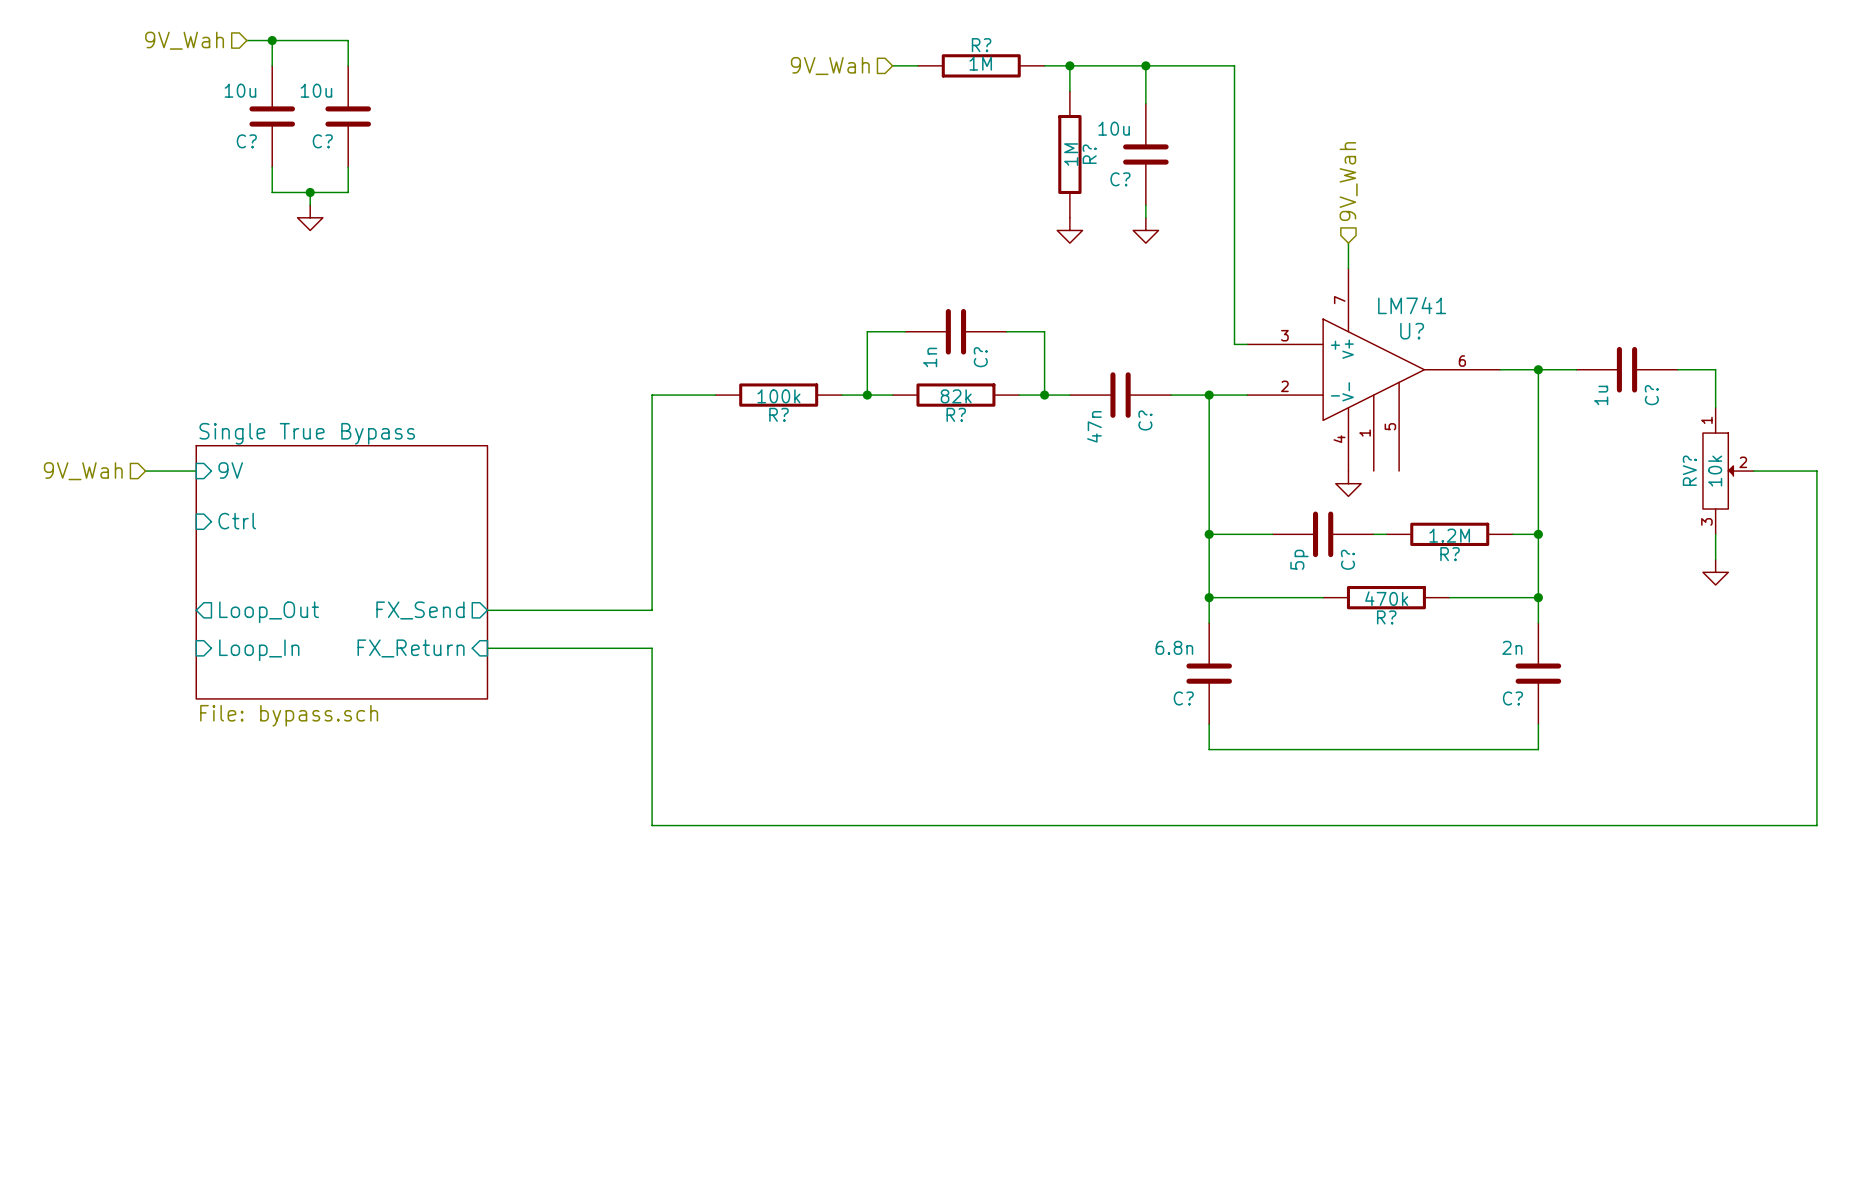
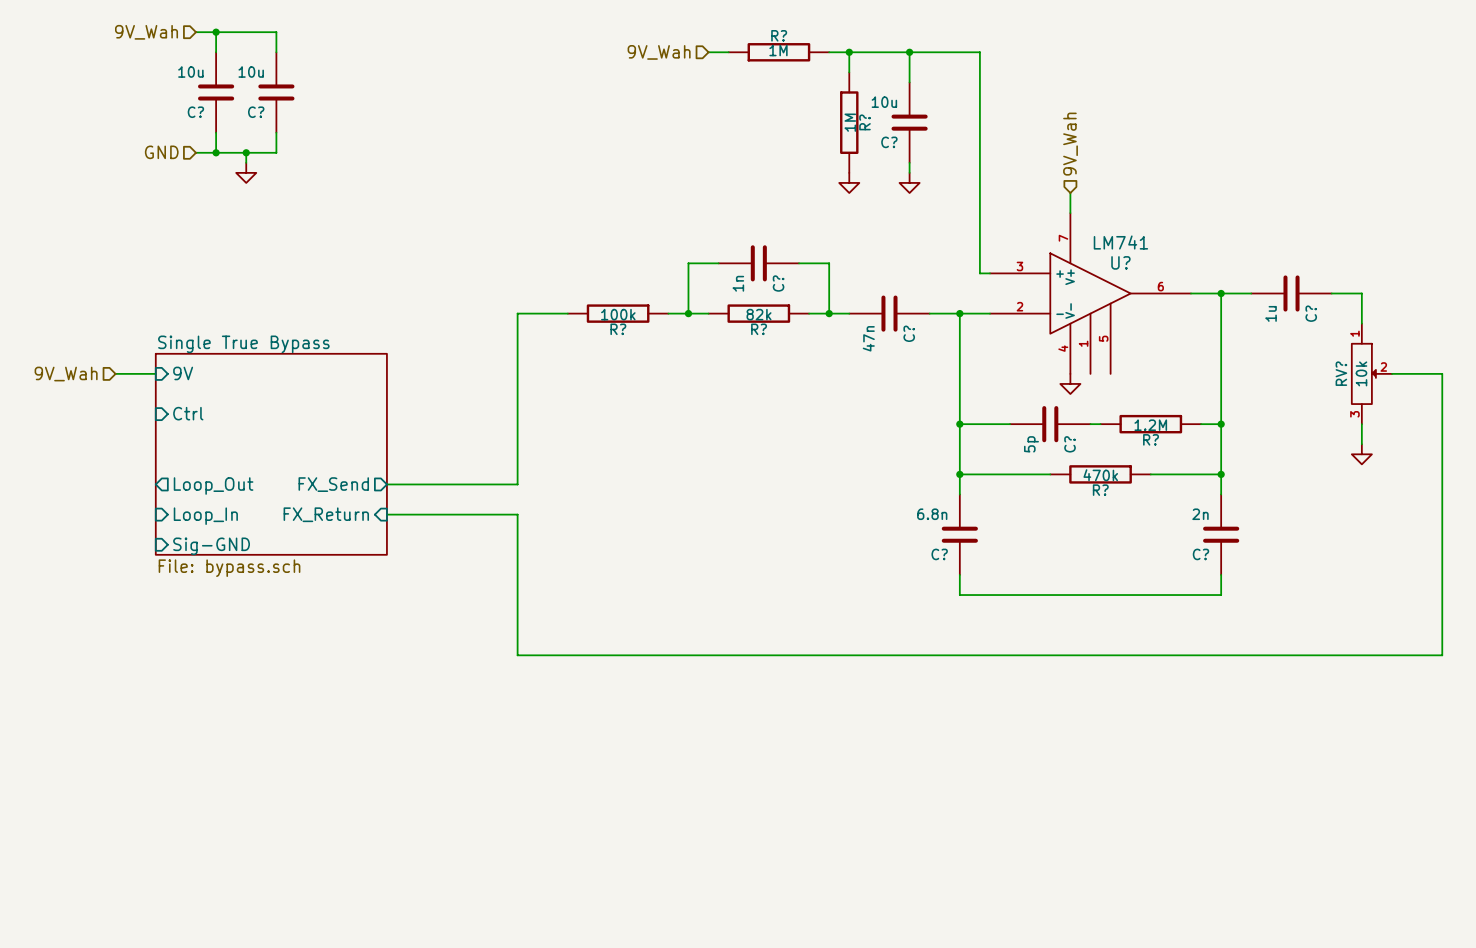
hierarchical label: none -> GND (161, 152)
wire: none -> (195, 152) (216, 152)
junction: none -> (216, 152)
sheet pin: none -> Sig-GND (211, 546)

